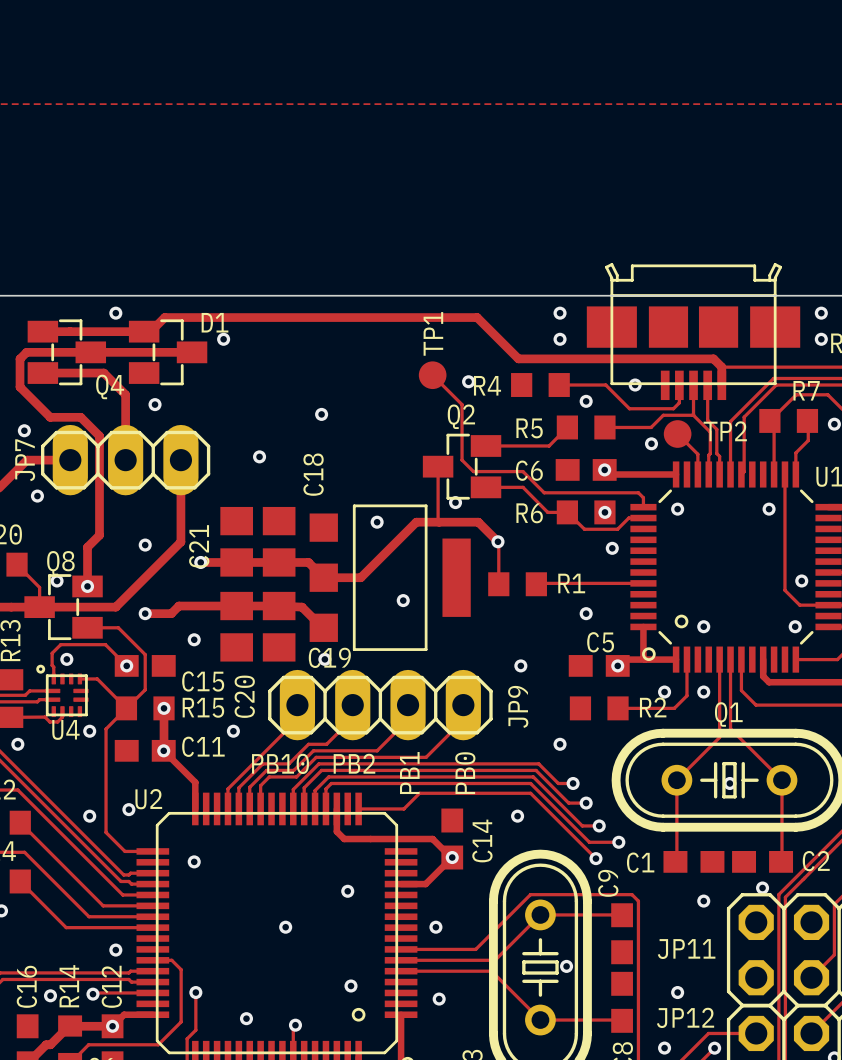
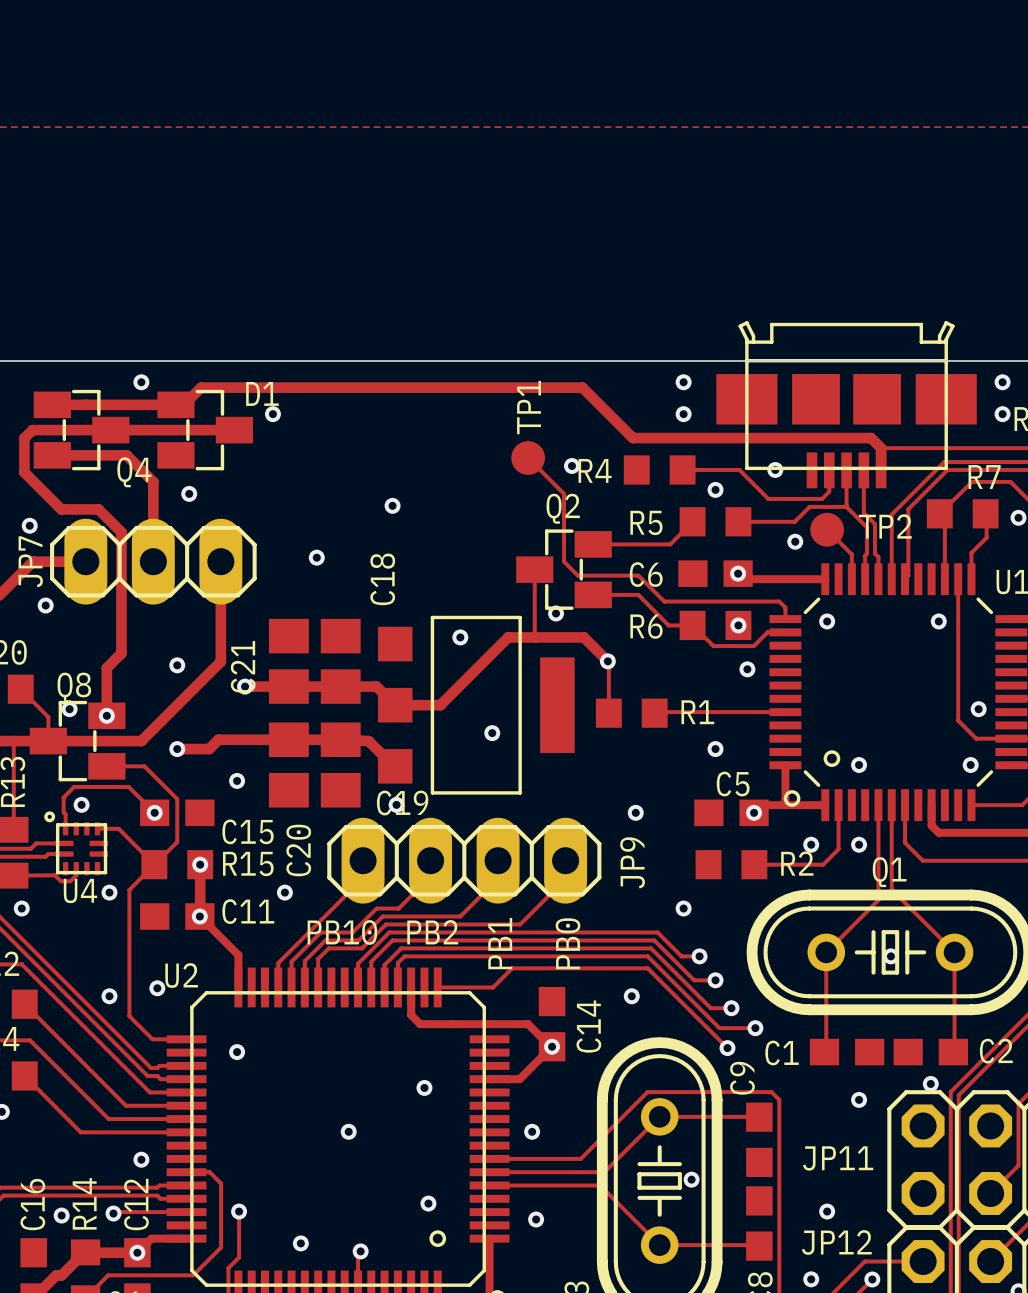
track: none -> (13, 741) (13, 828)

